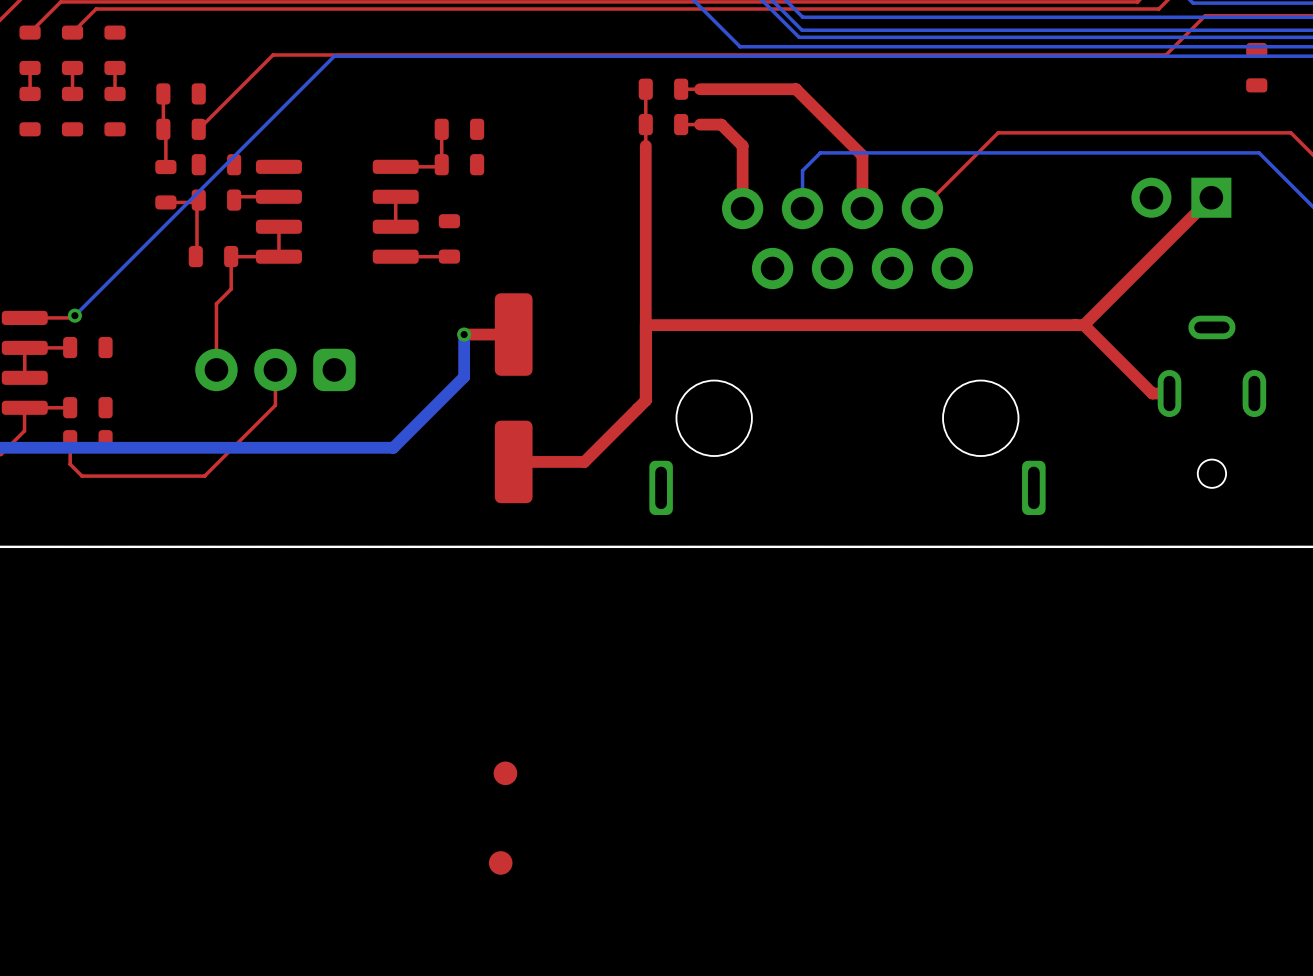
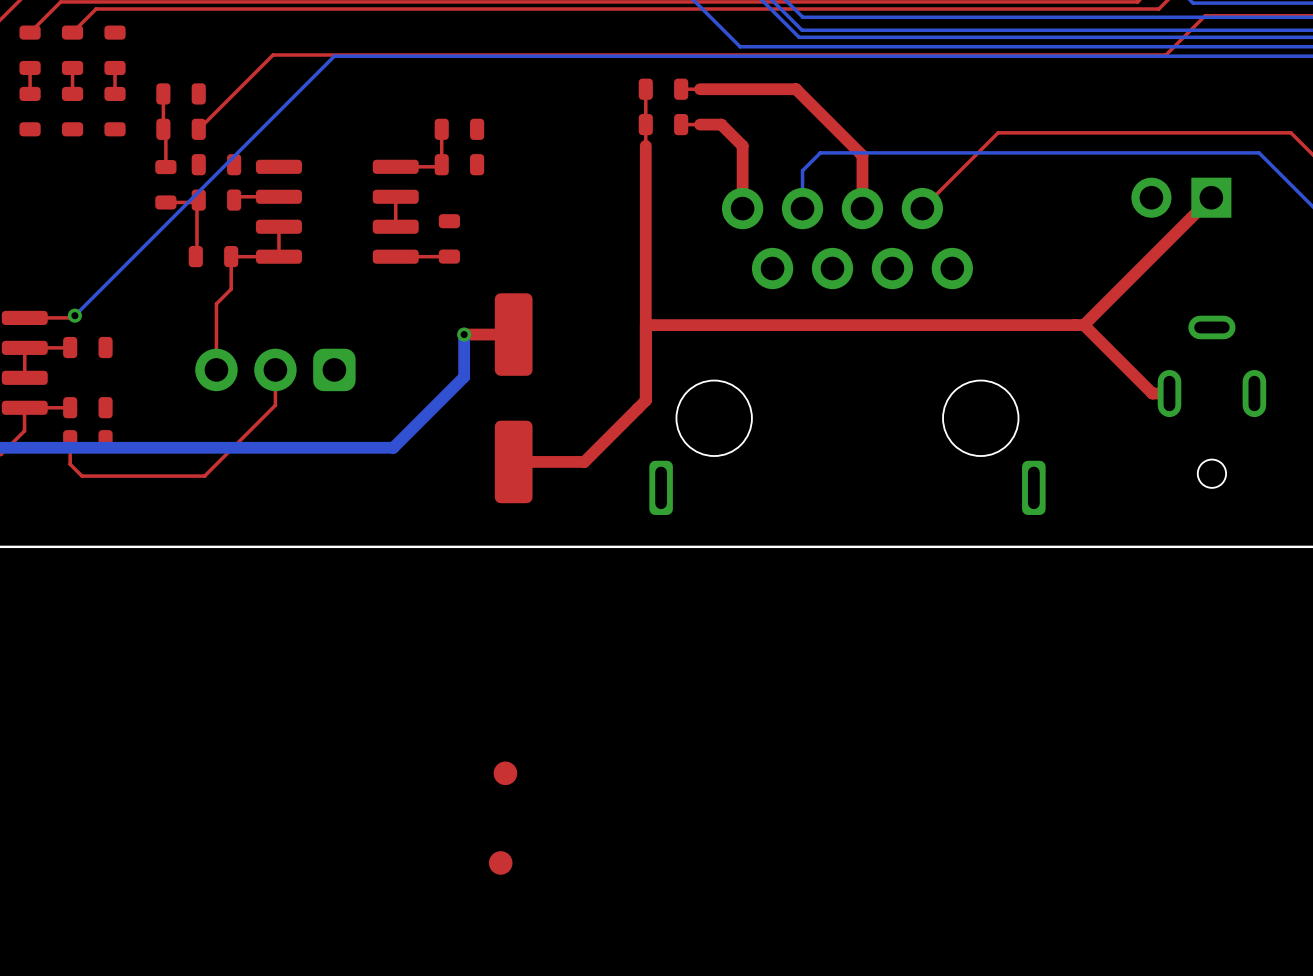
part: (1256, 67) -> none

